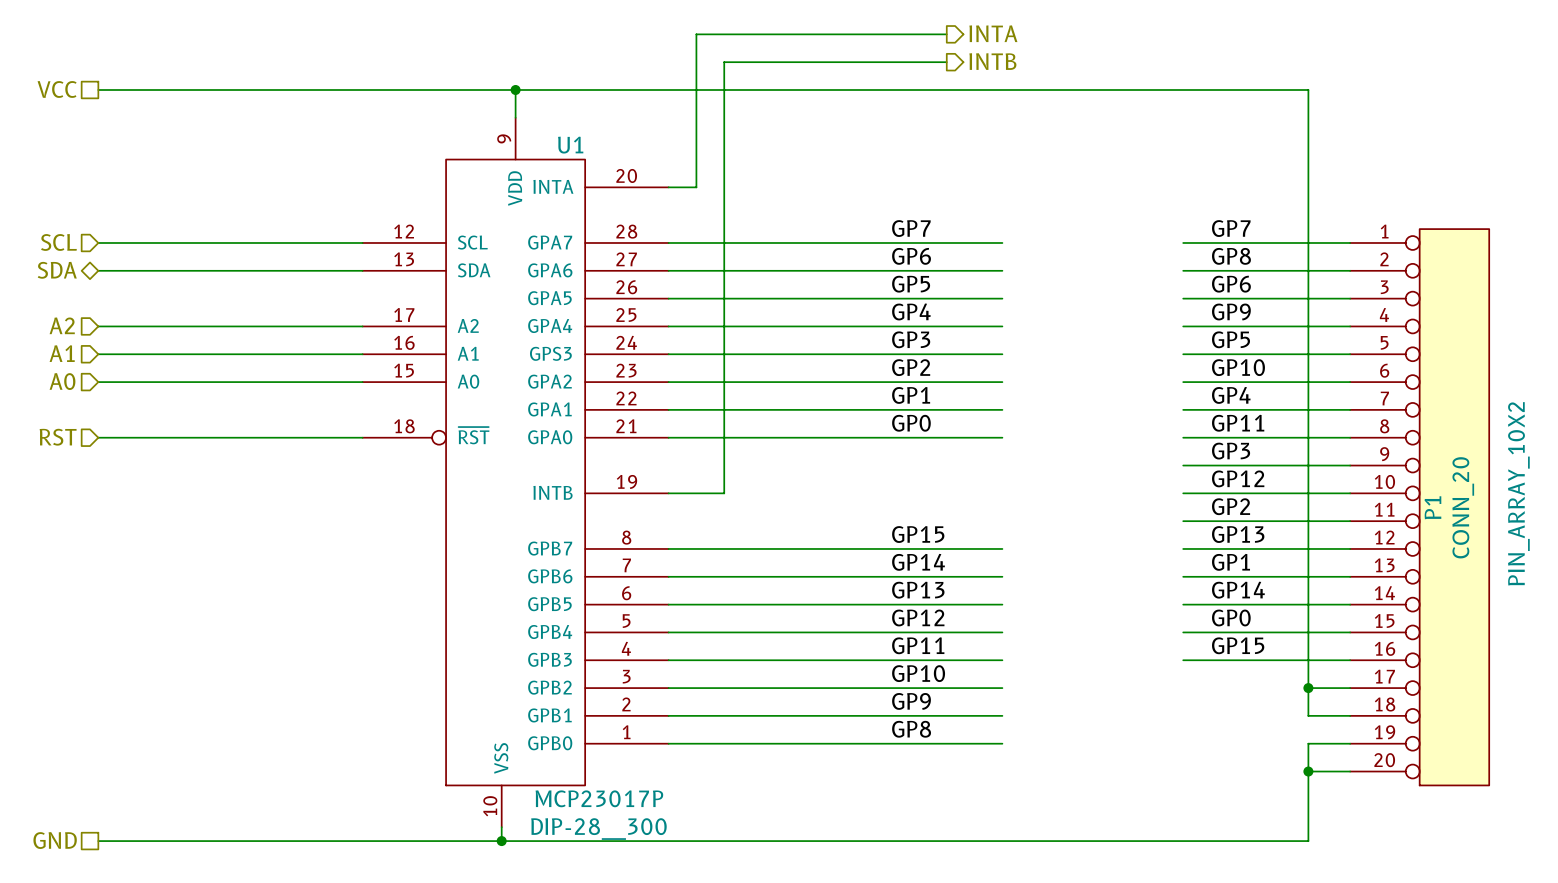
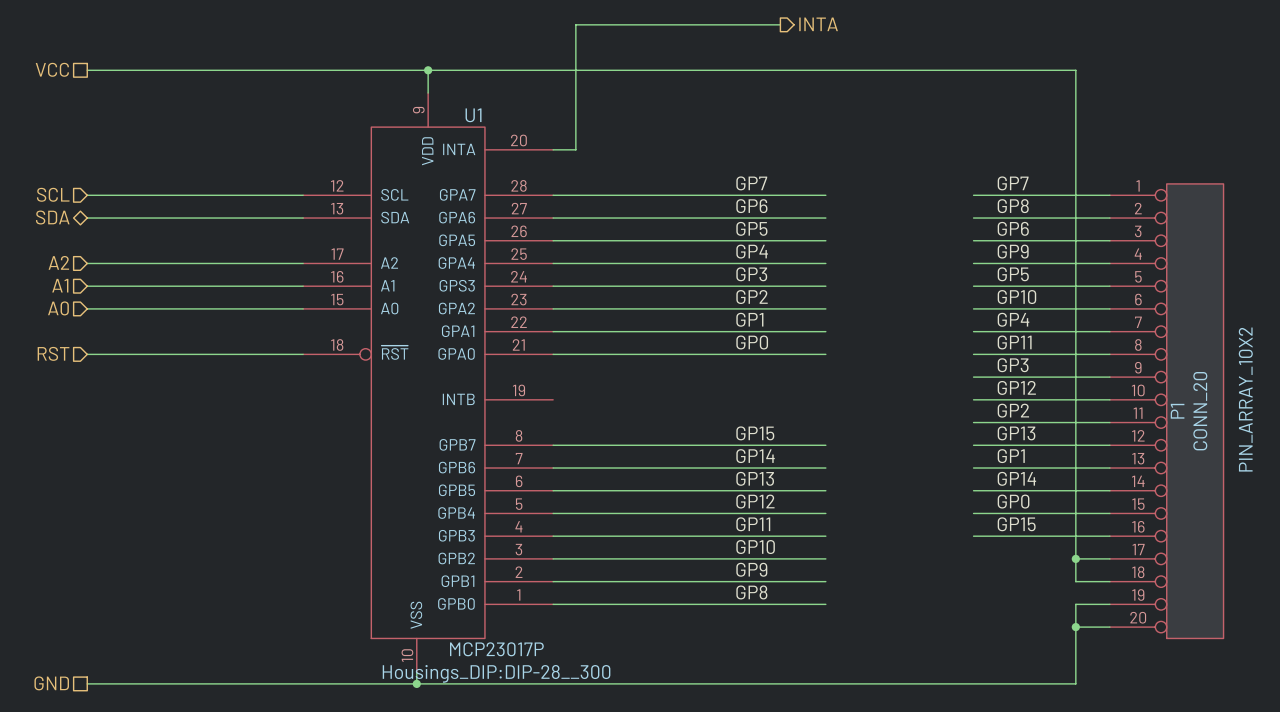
hierarchical label: INTB (992, 61) -> none
wire: (946, 62) (724, 62) (724, 493) (668, 493) -> none
U1 text: DIP-28__300 (598, 829) -> Housings_DIP:DIP-28__300 (496, 673)

